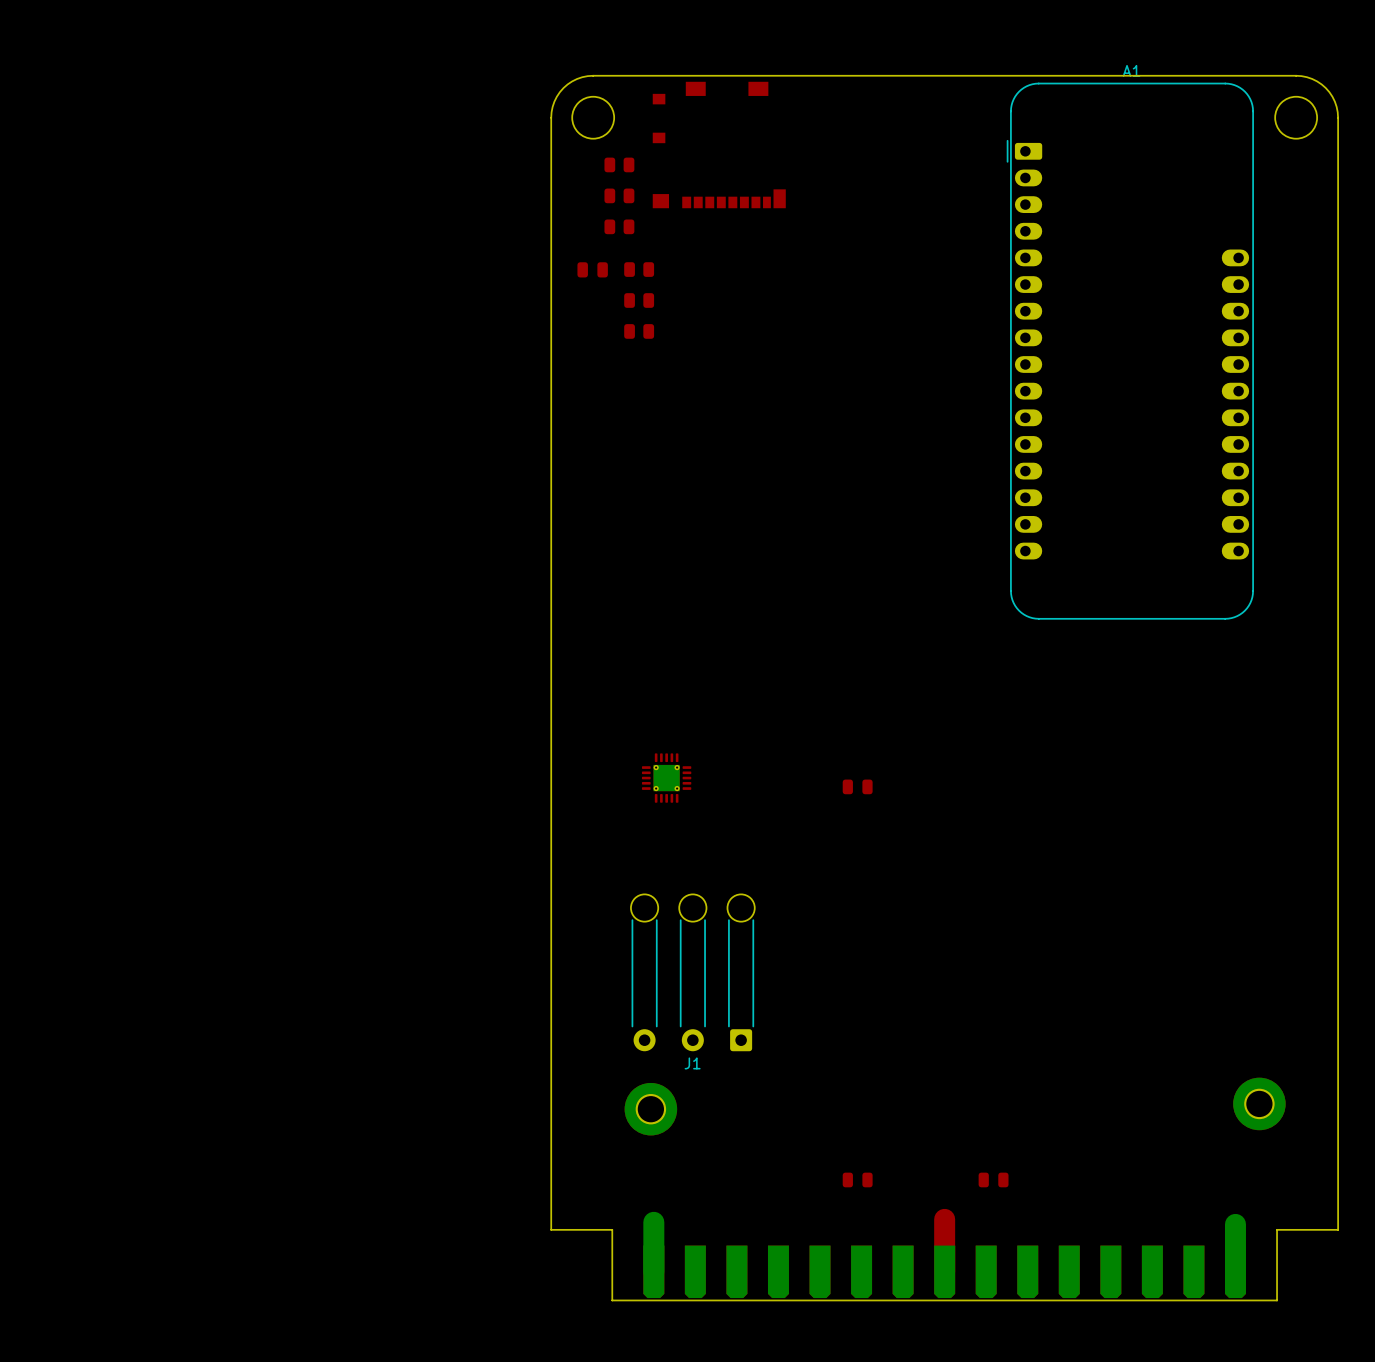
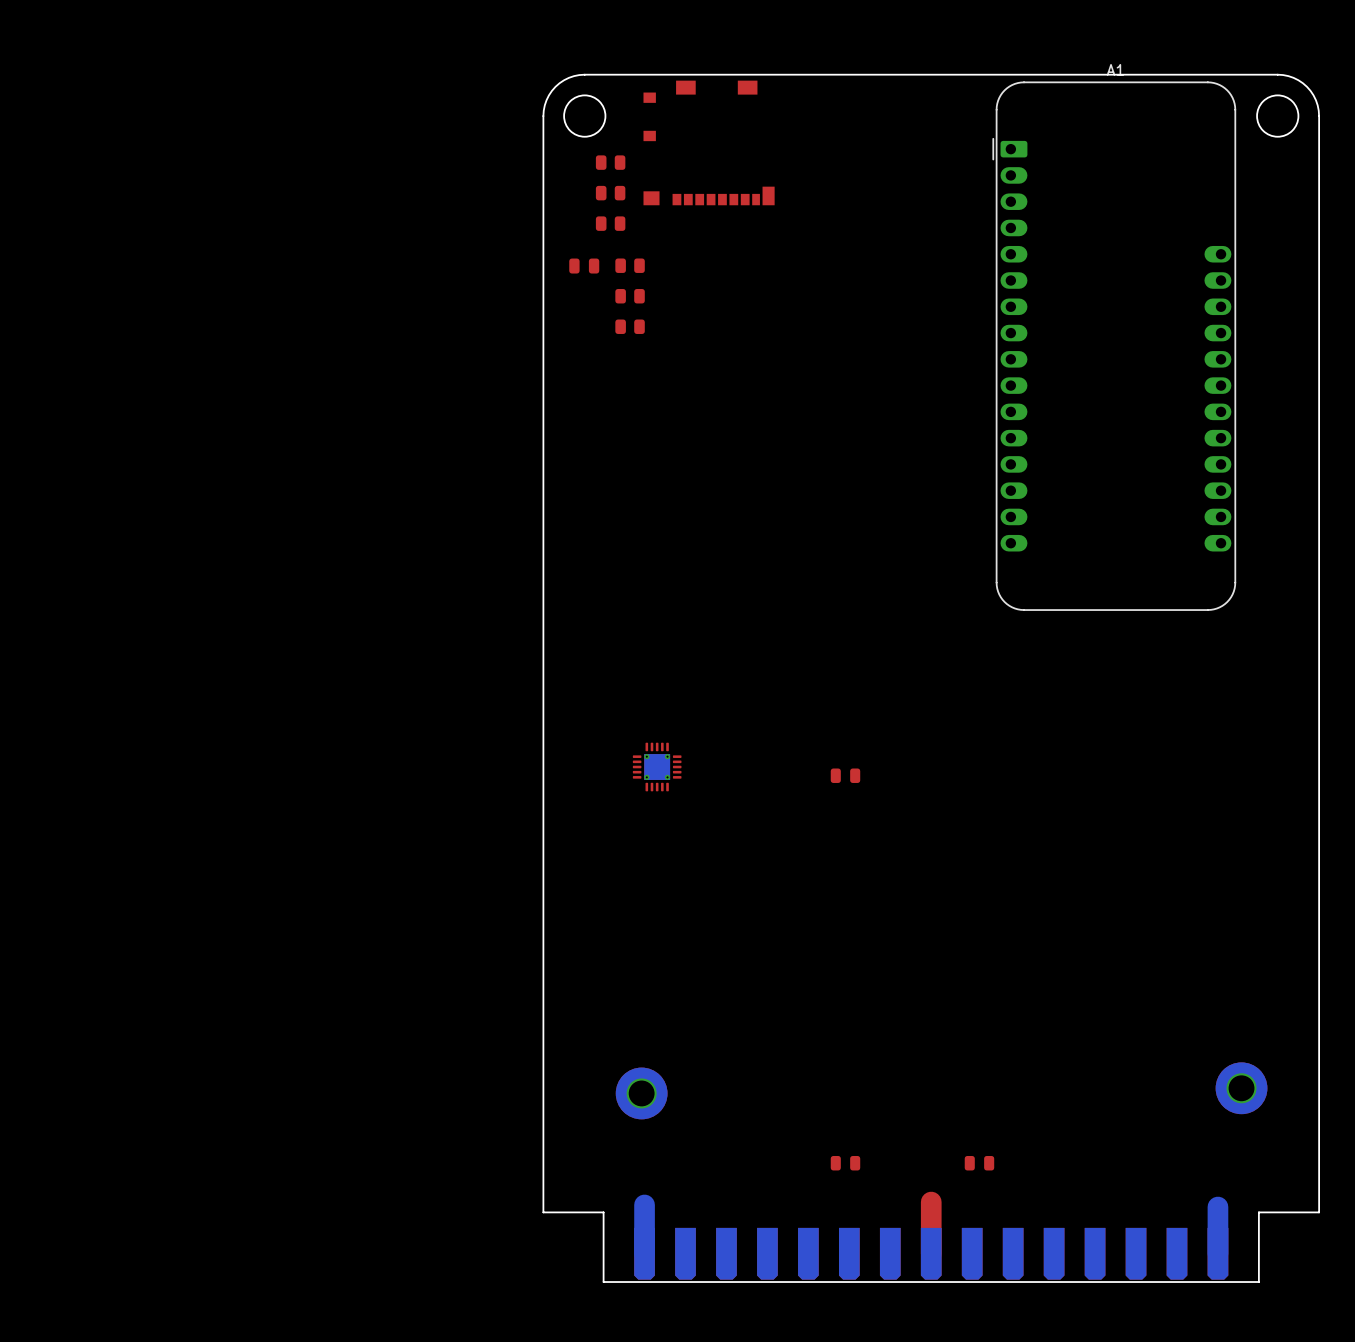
J1: (692, 972) -> none

